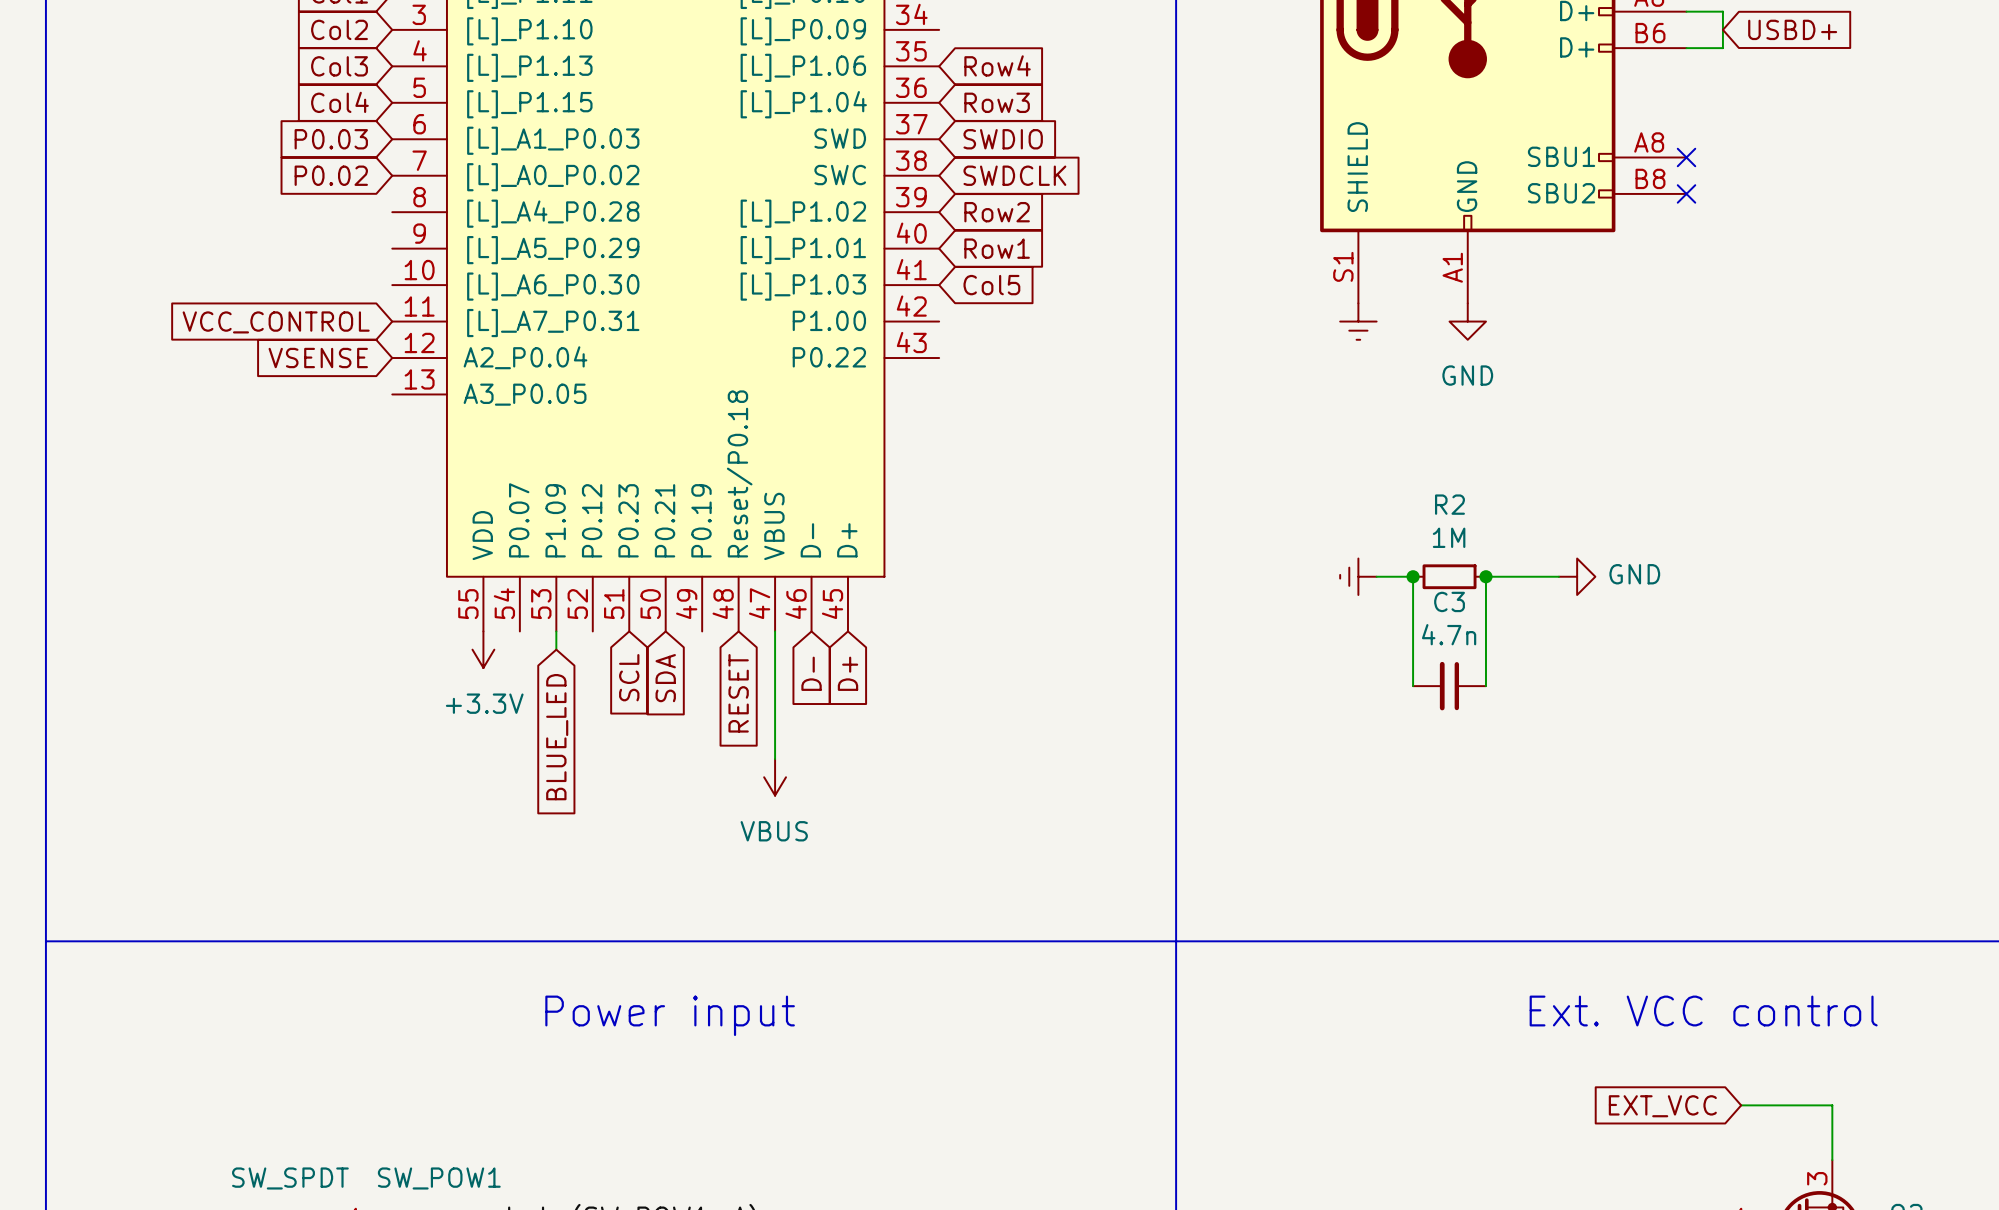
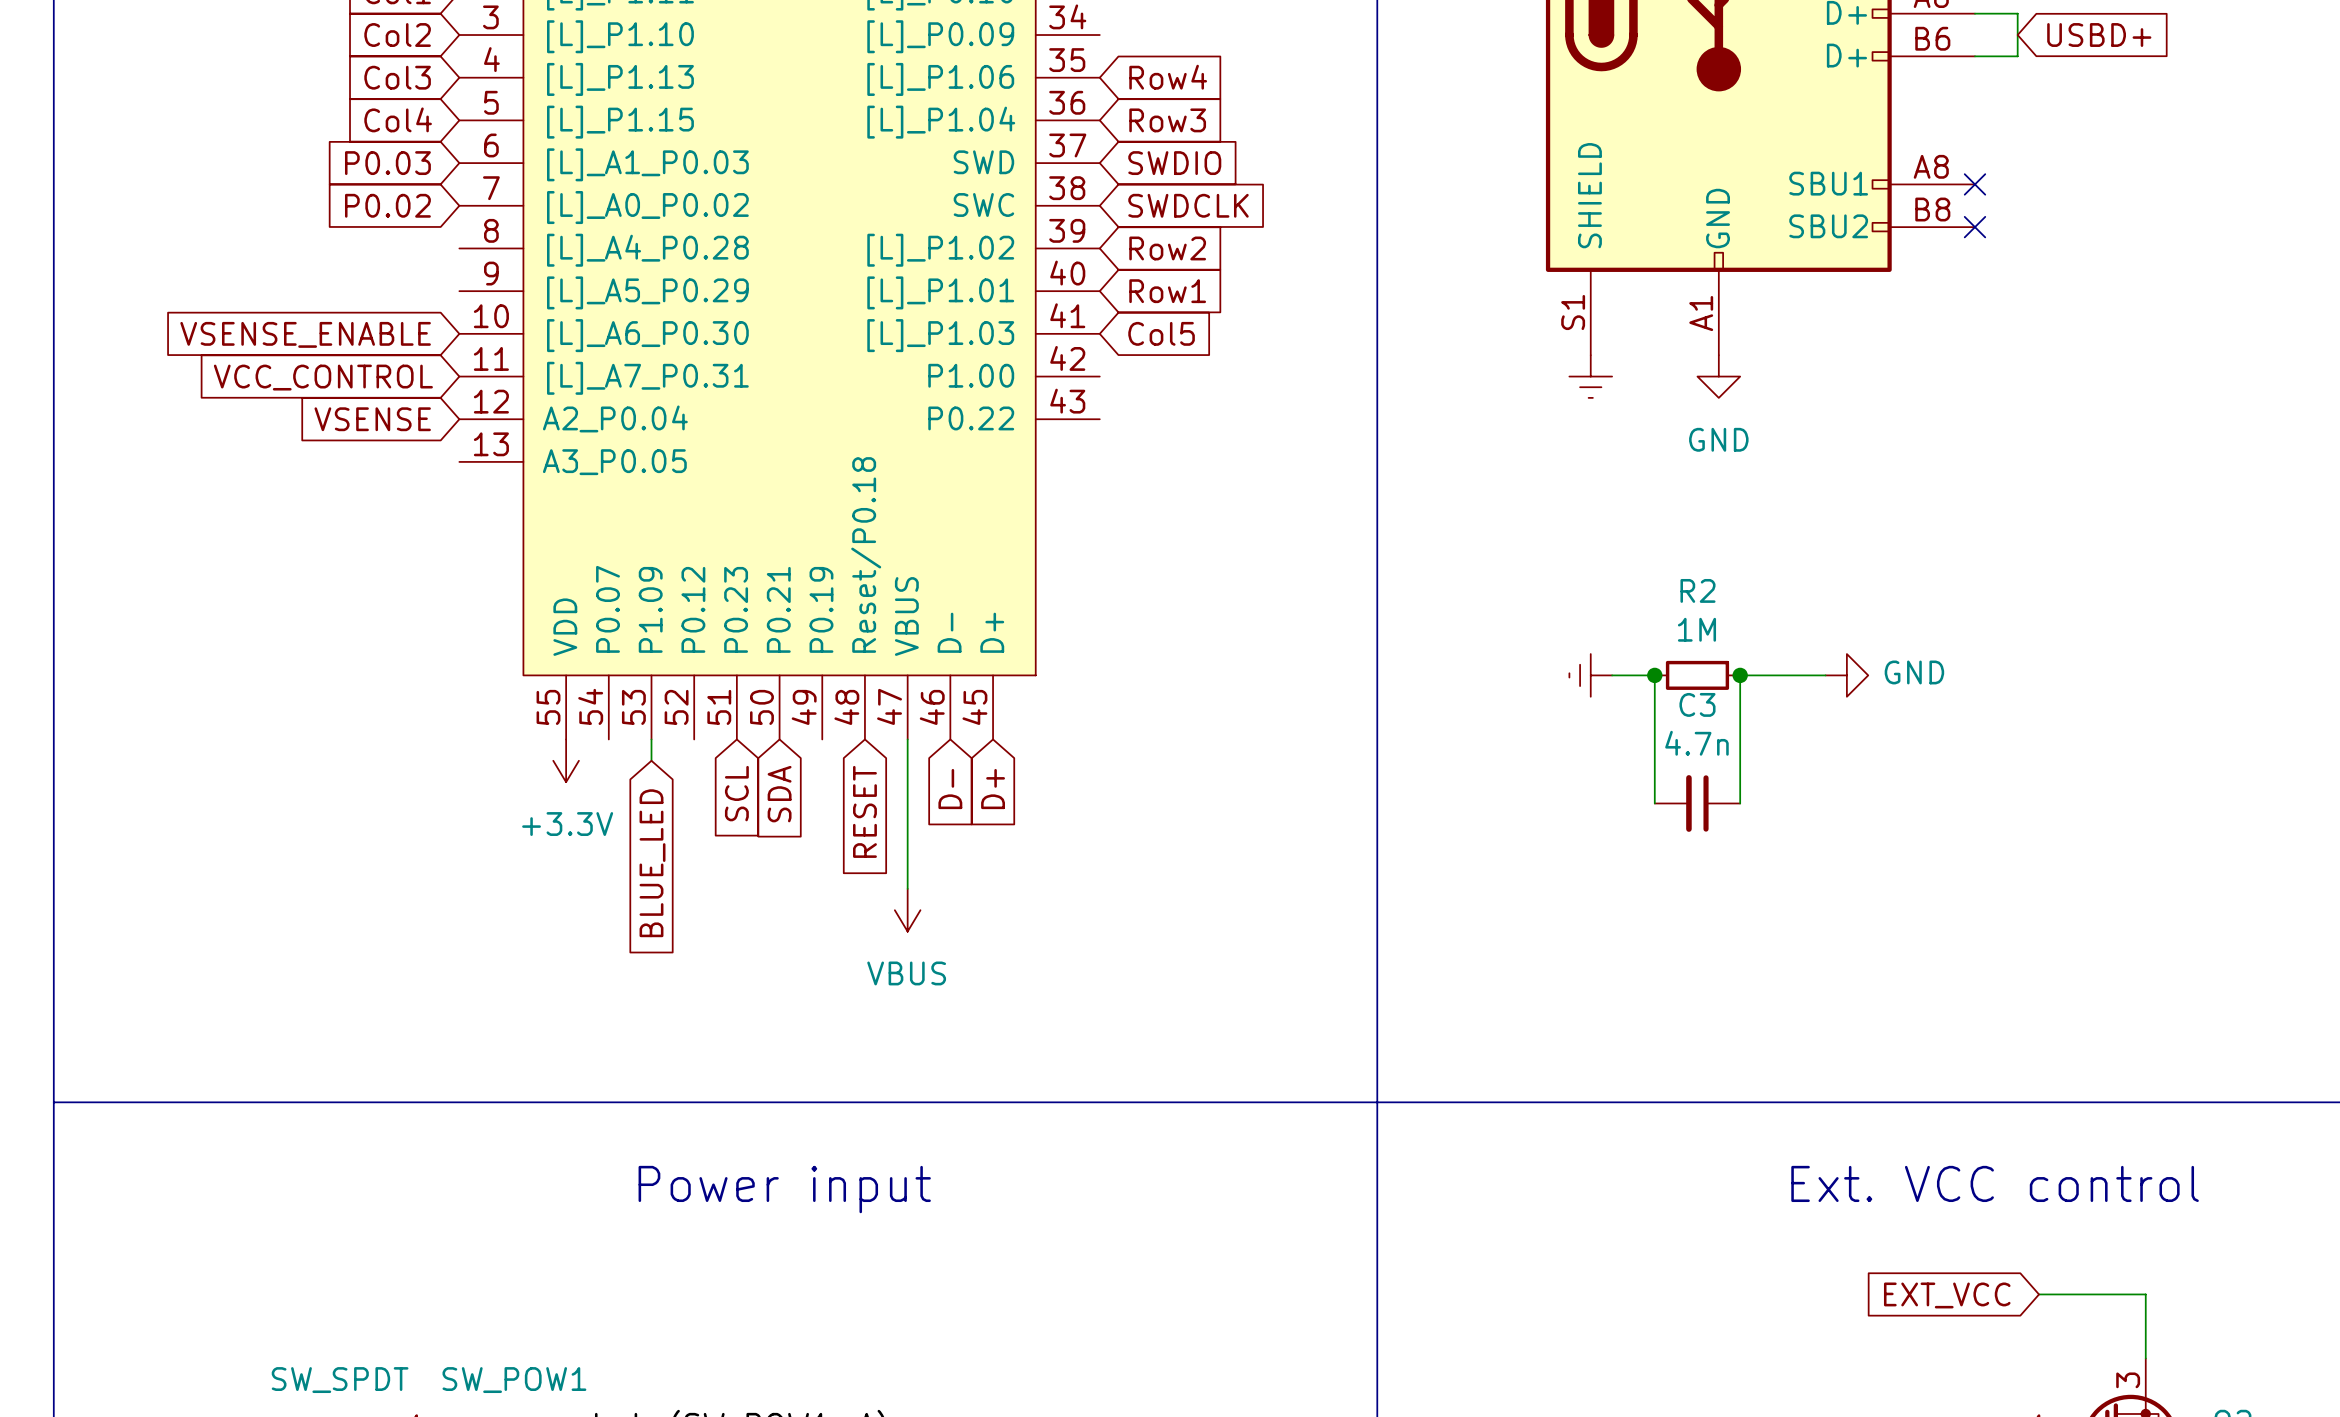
global label: none -> VSENSE_ENABLE (305, 334)

